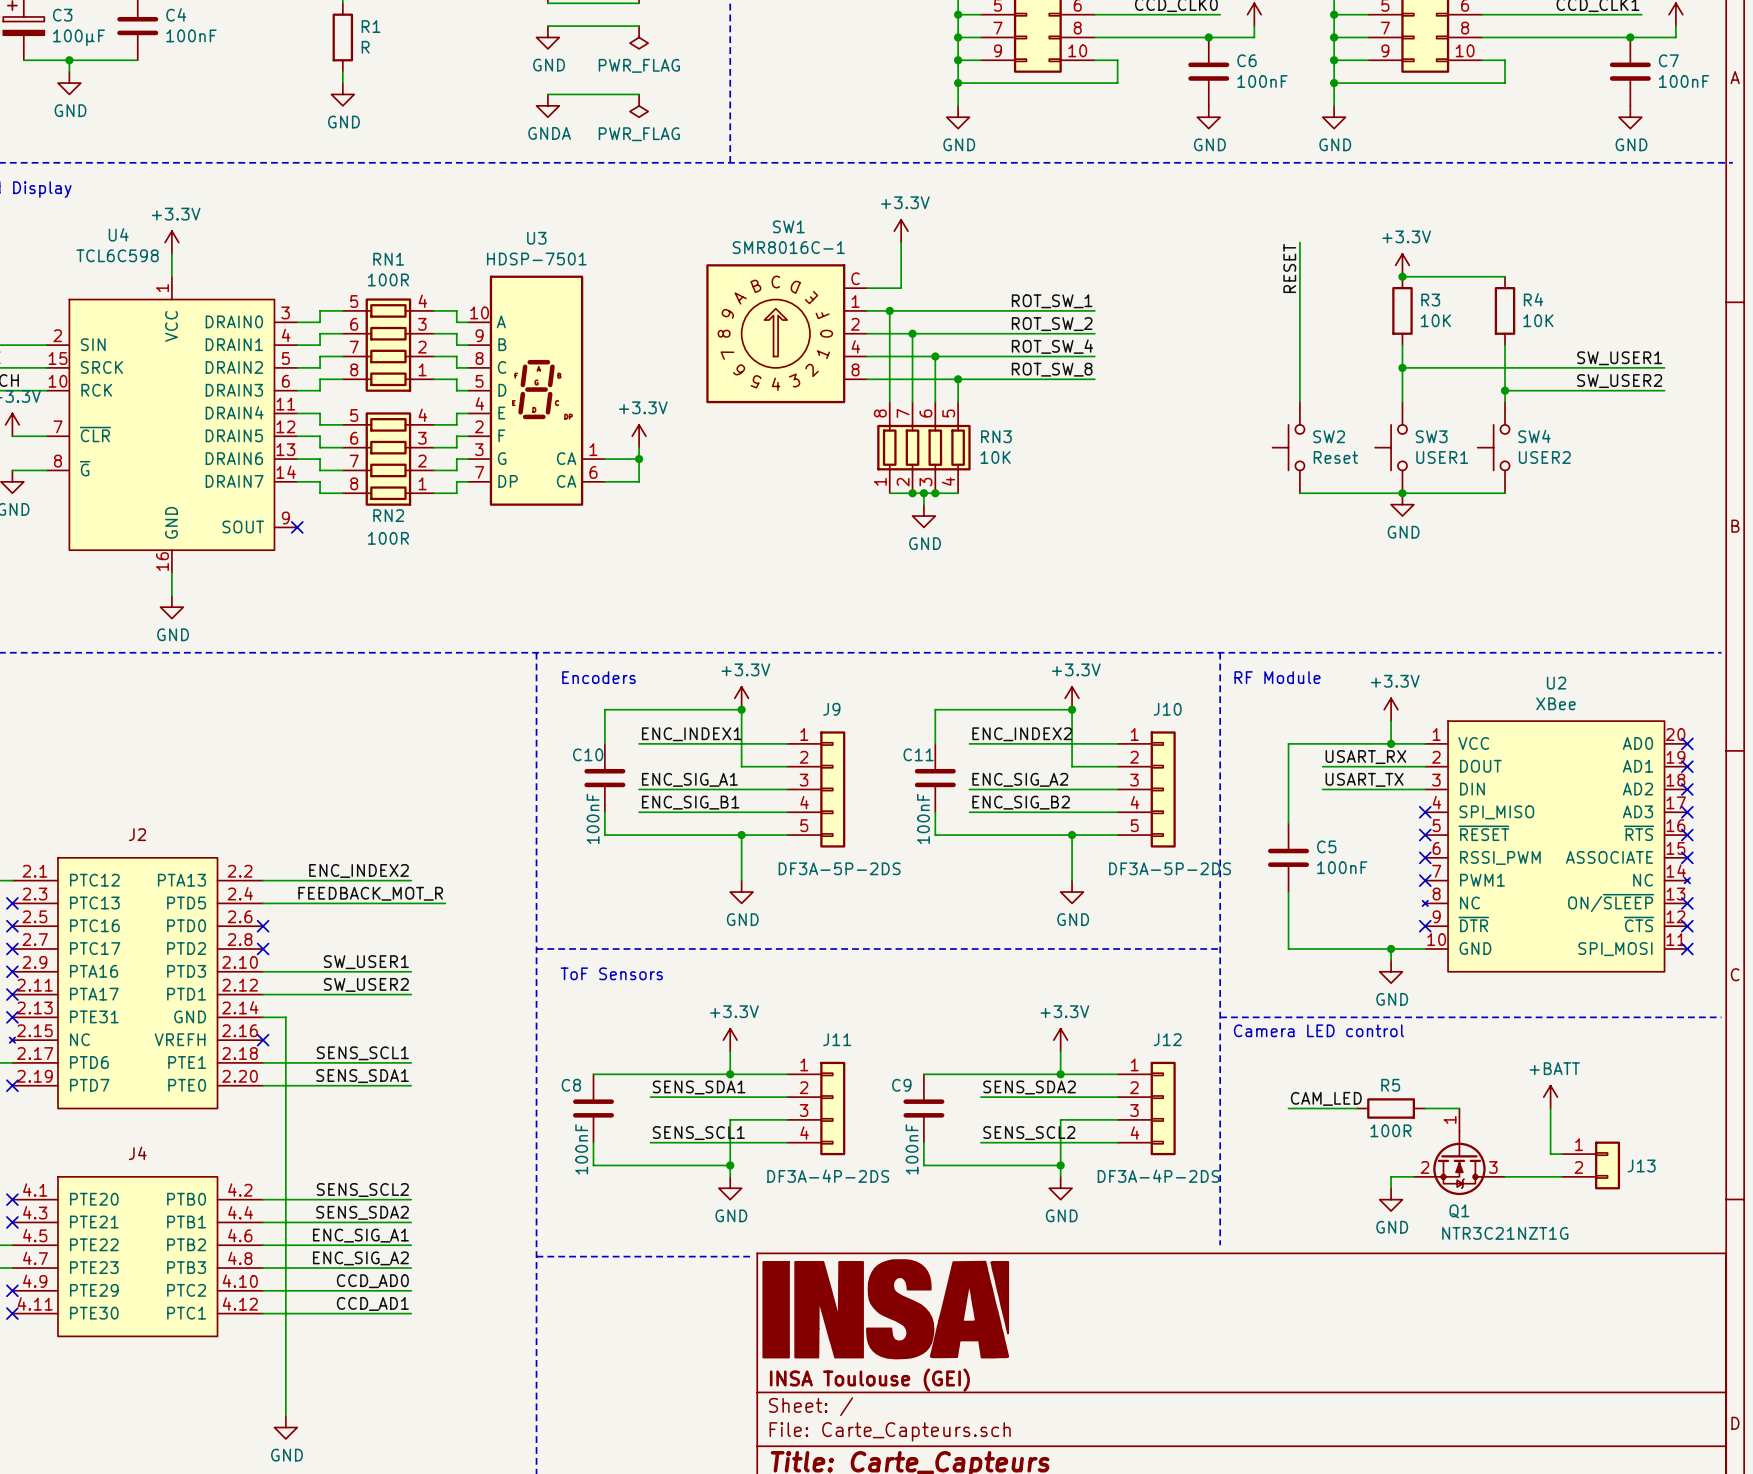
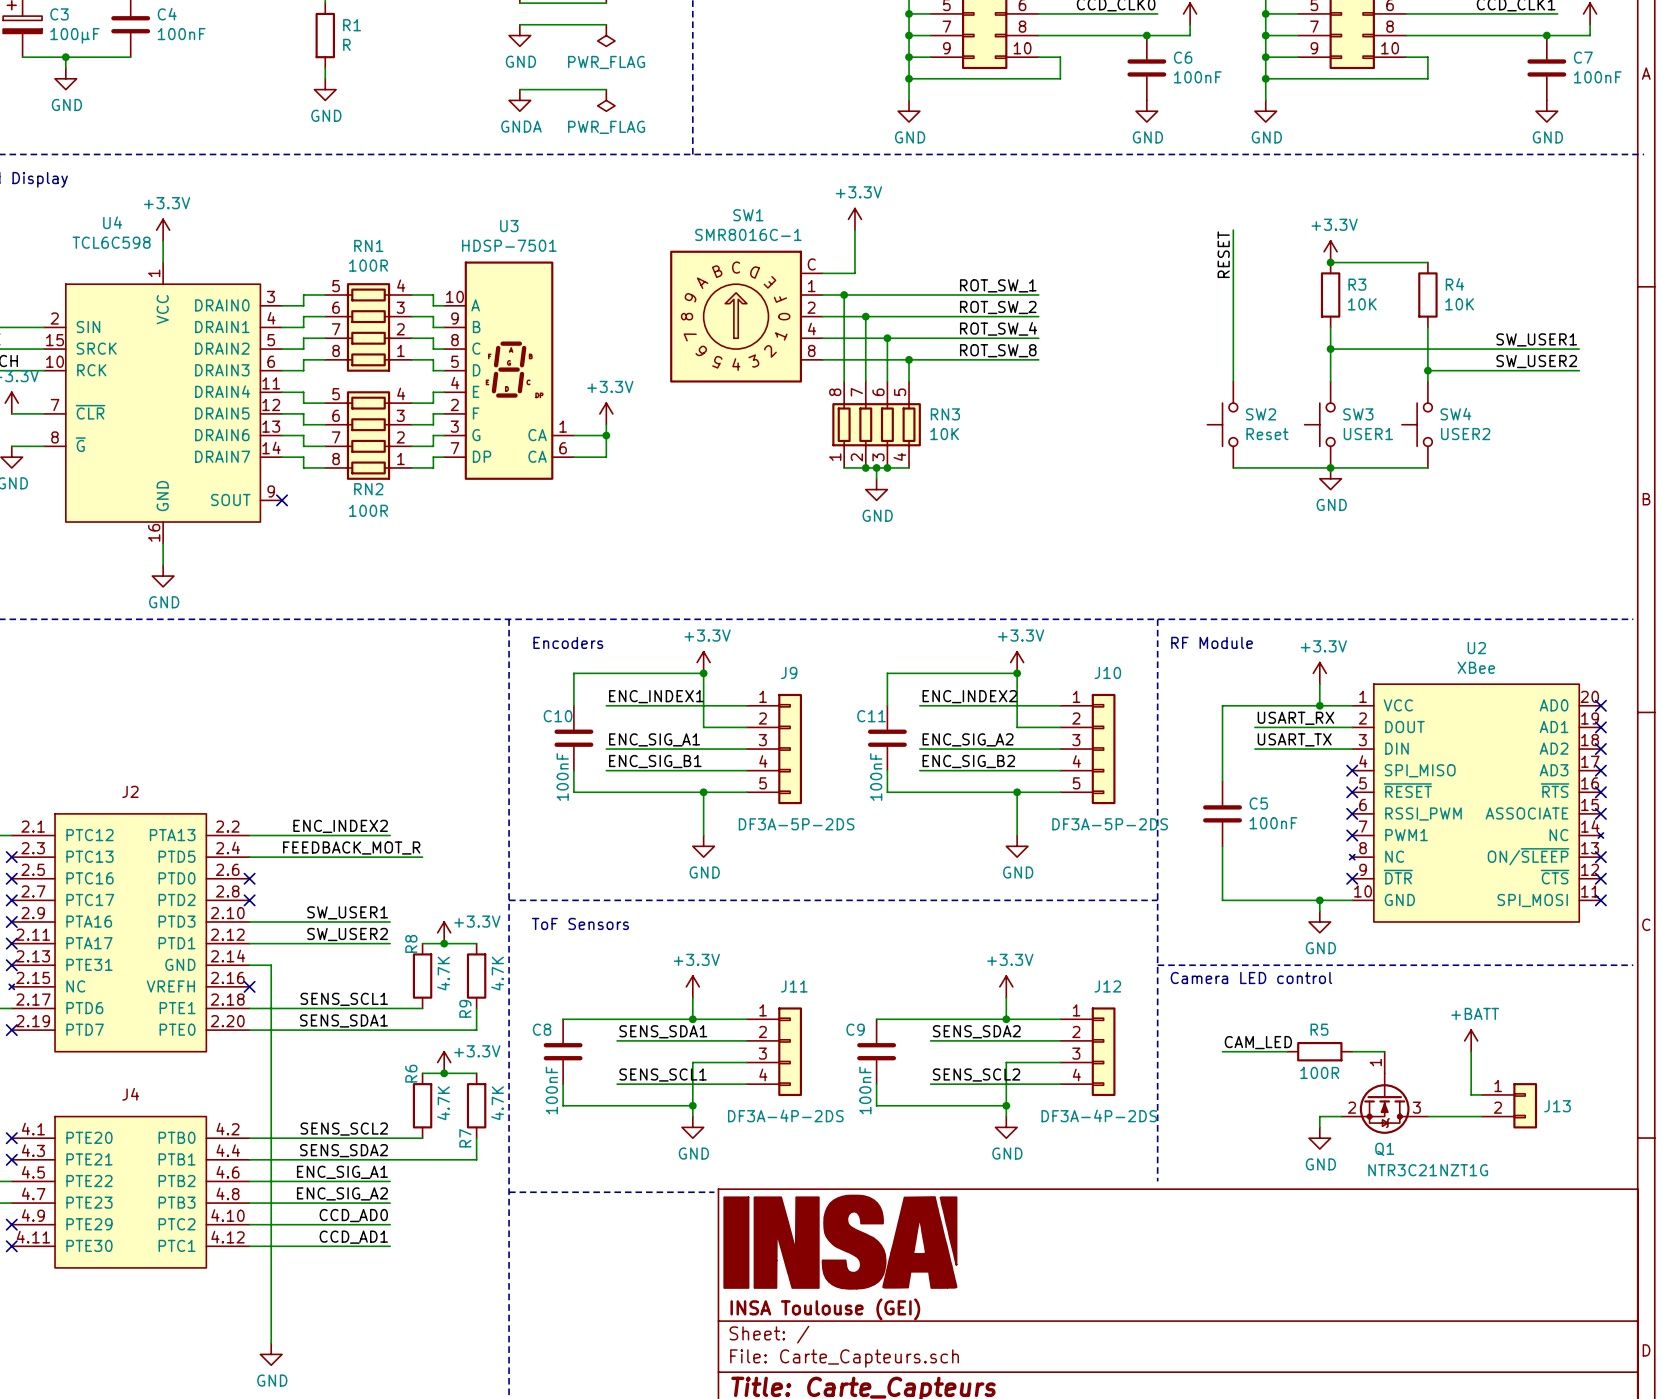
power symbol: none -> +3.3V (444, 932)
wire: none -> (422, 943) (476, 943)
junction: none -> (444, 943)
R8: none -> 4.7K (422, 976)
R9: none -> 4.7K (476, 976)
wire: none -> (390, 1008) (422, 1008)
wire: none -> (476, 1008) (476, 1030) (390, 1030)
power symbol: none -> +3.3V (444, 1062)
wire: none -> (422, 1073) (476, 1073)
junction: none -> (444, 1073)
R6: none -> 4.7K (422, 1105)
R7: none -> 4.7K (476, 1105)
wire: none -> (390, 1138) (422, 1138)
wire: none -> (476, 1138) (476, 1159) (390, 1159)

